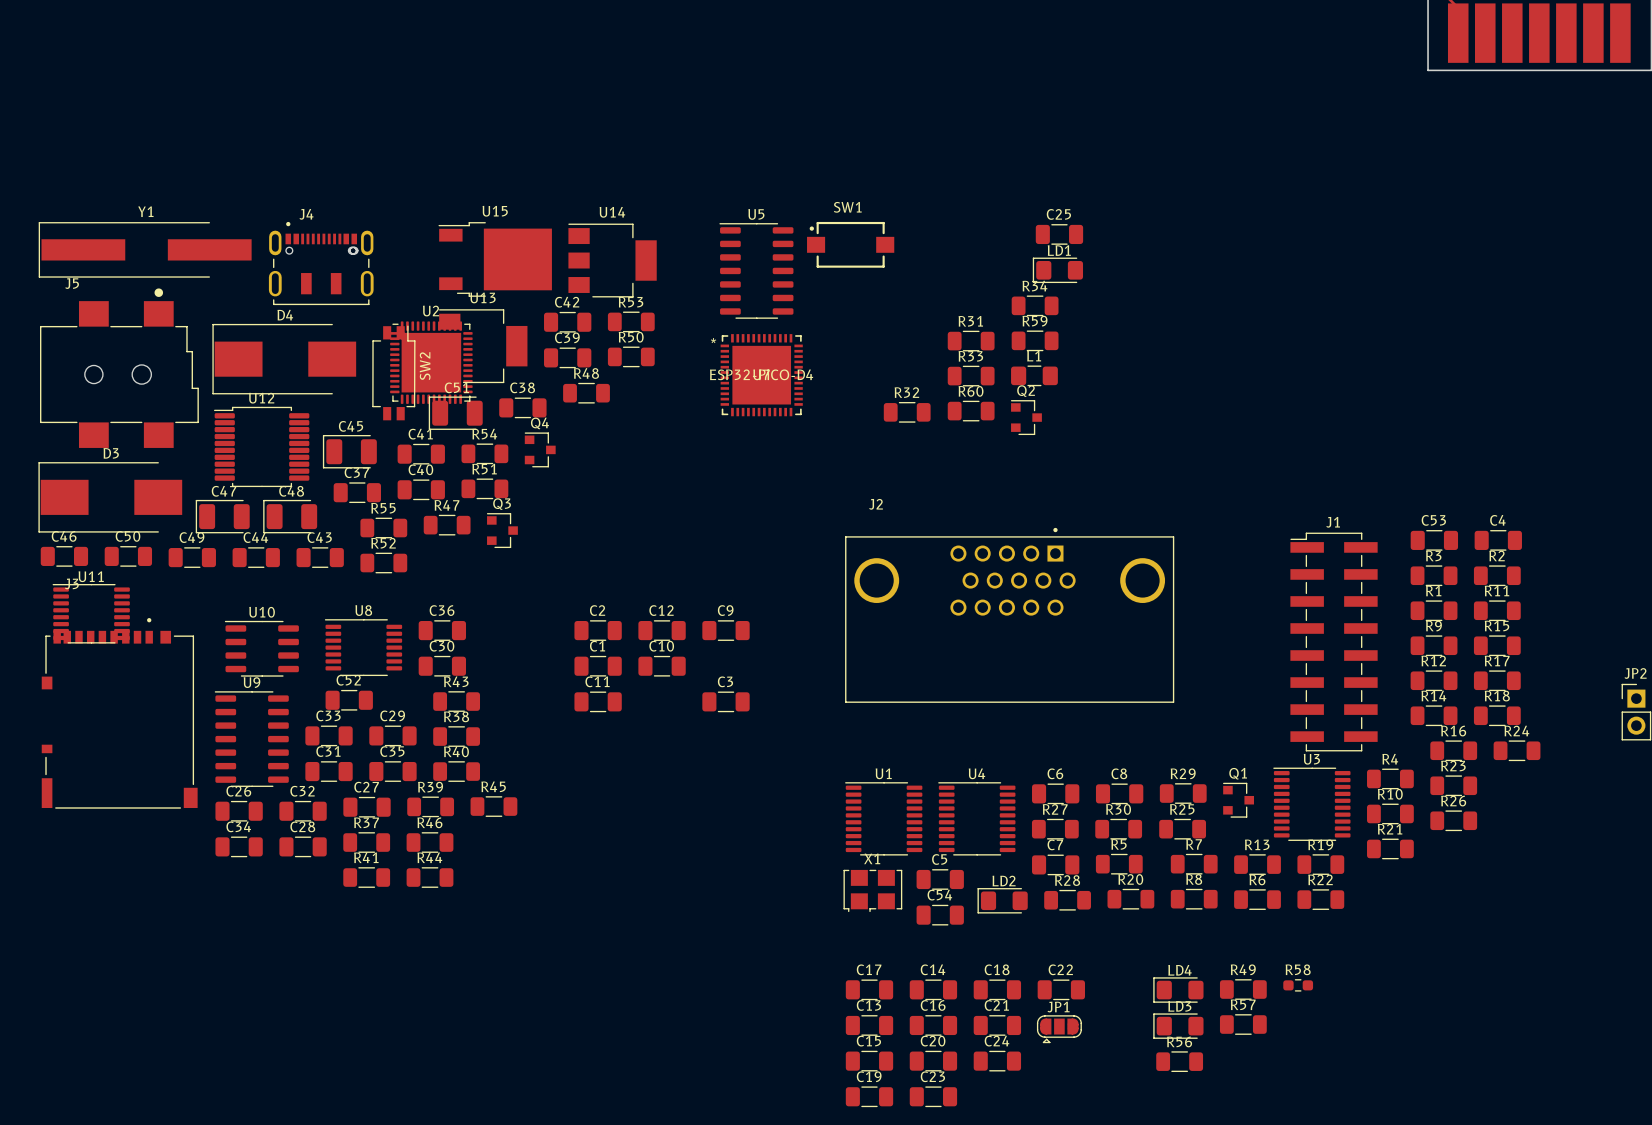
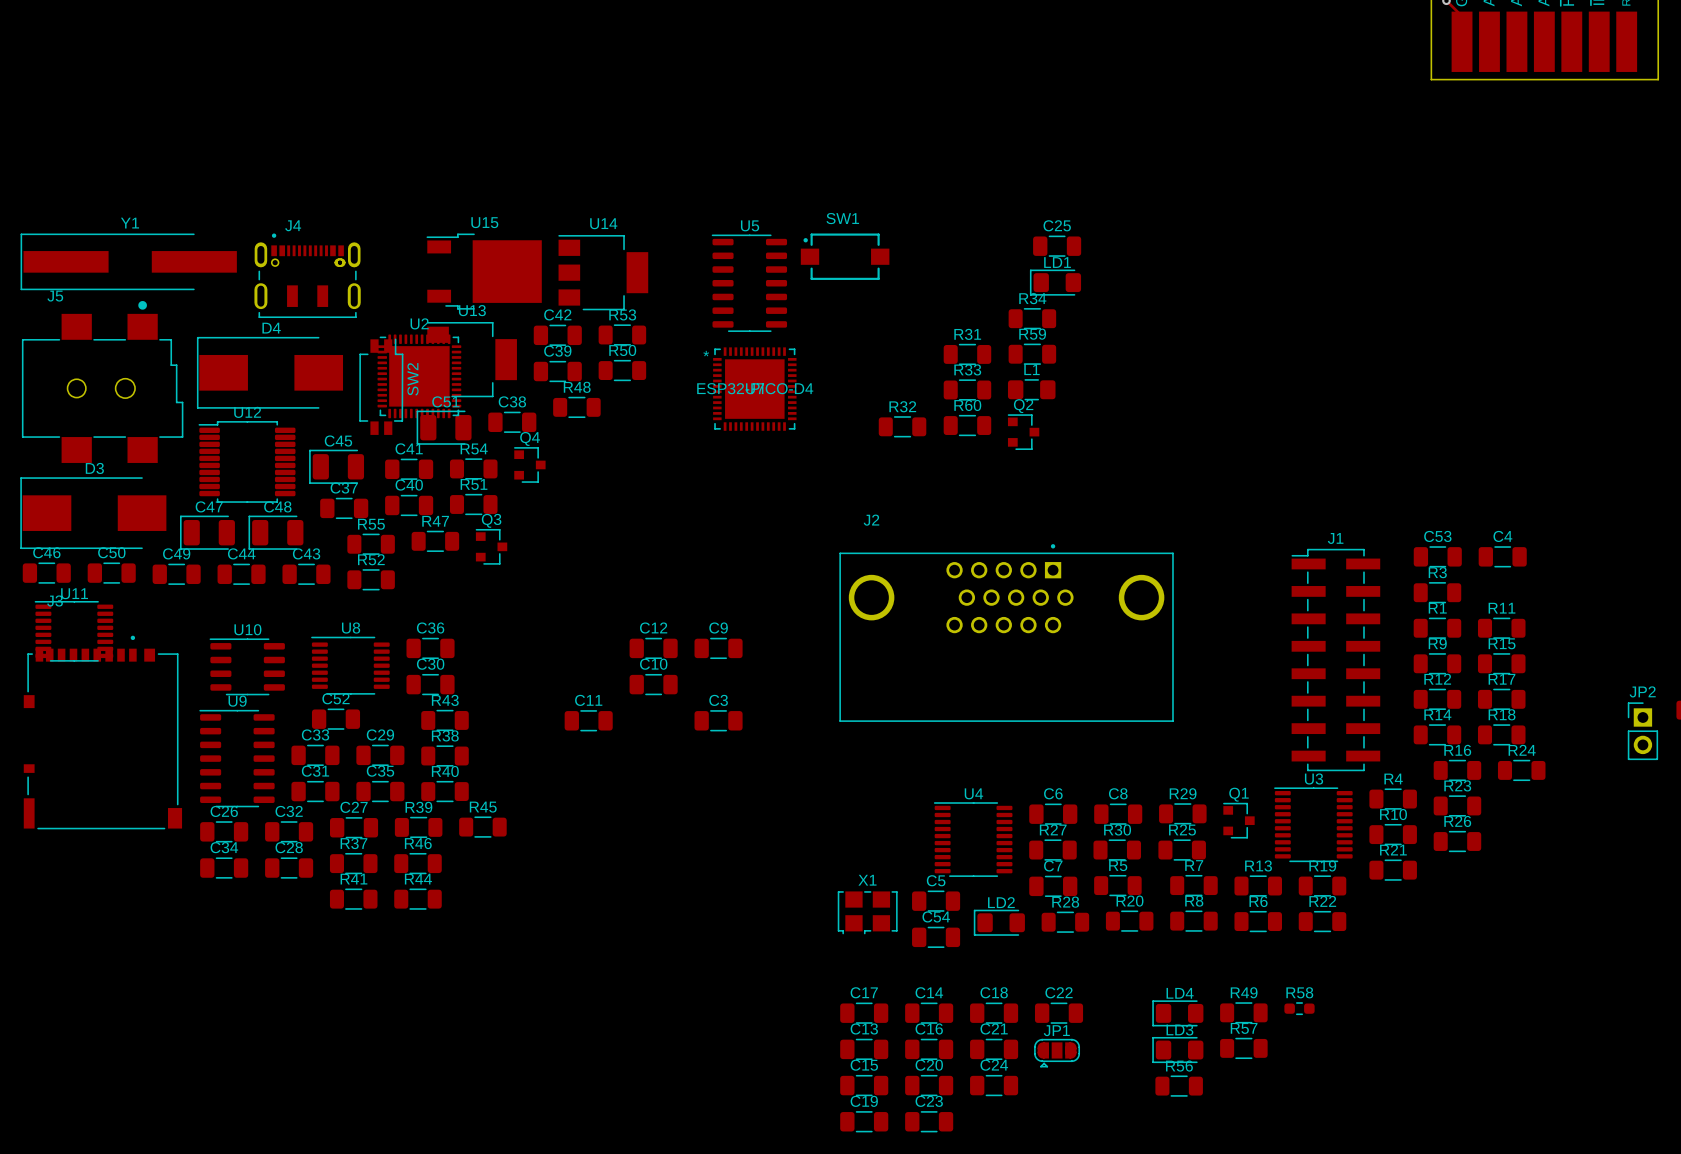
R2: (1497, 575) -> none
C2: (598, 630) -> none
C1: (598, 666) -> none
U1: (883, 818) -> none

